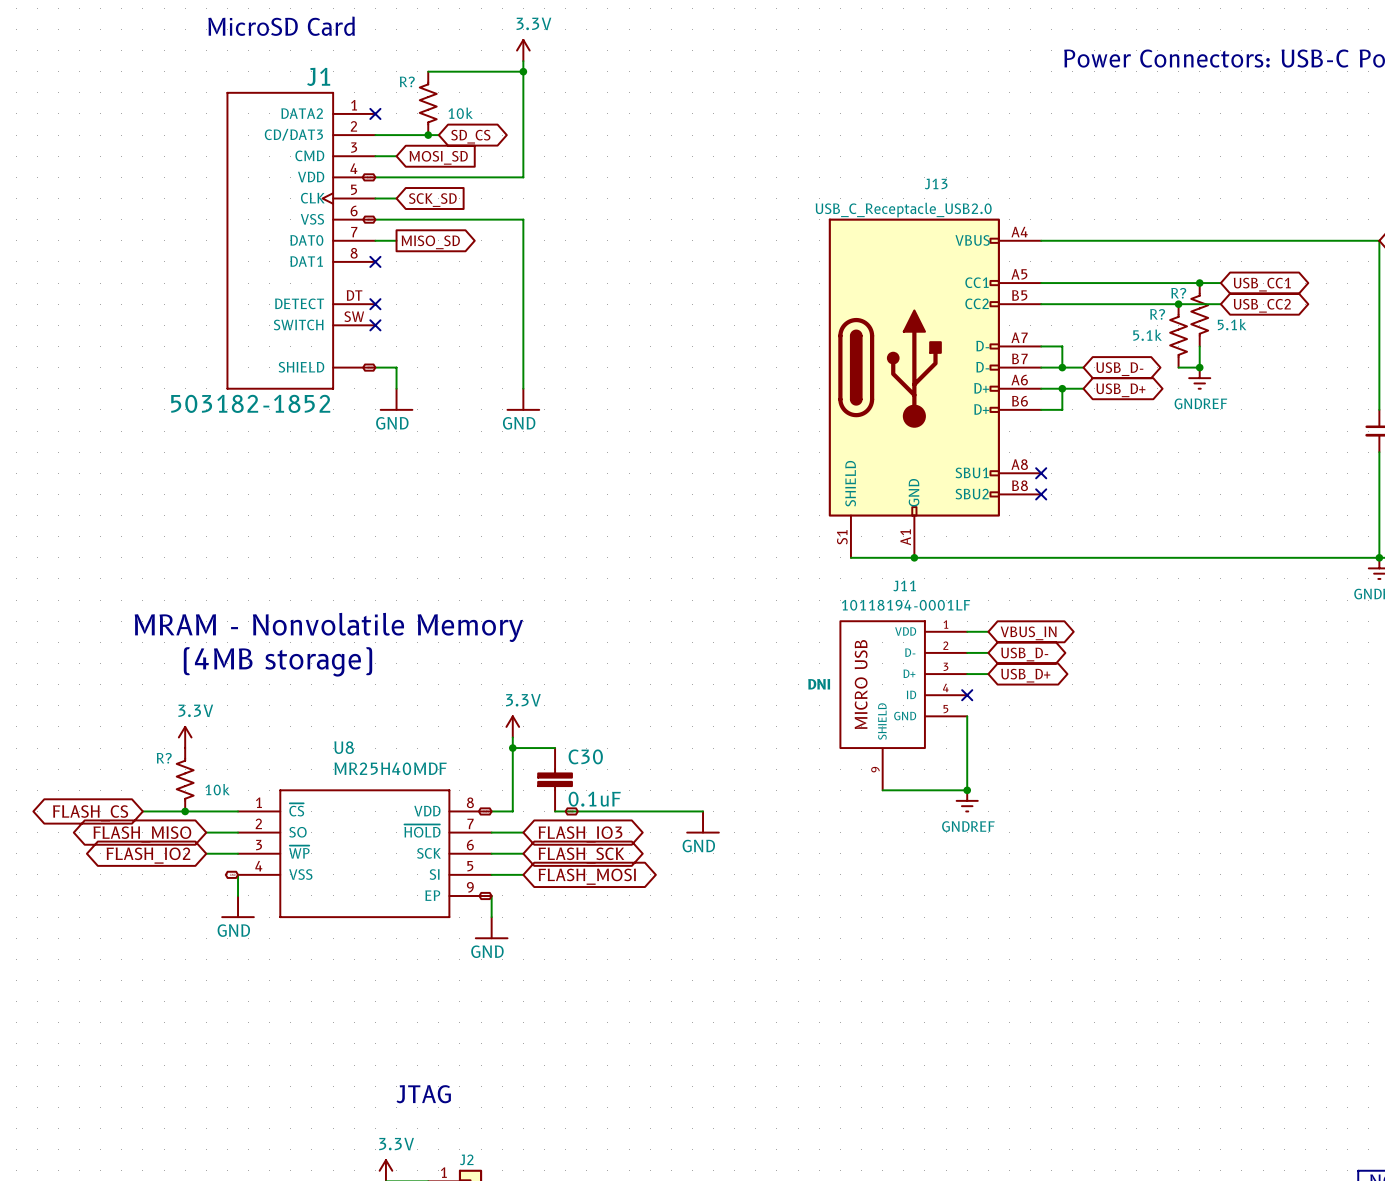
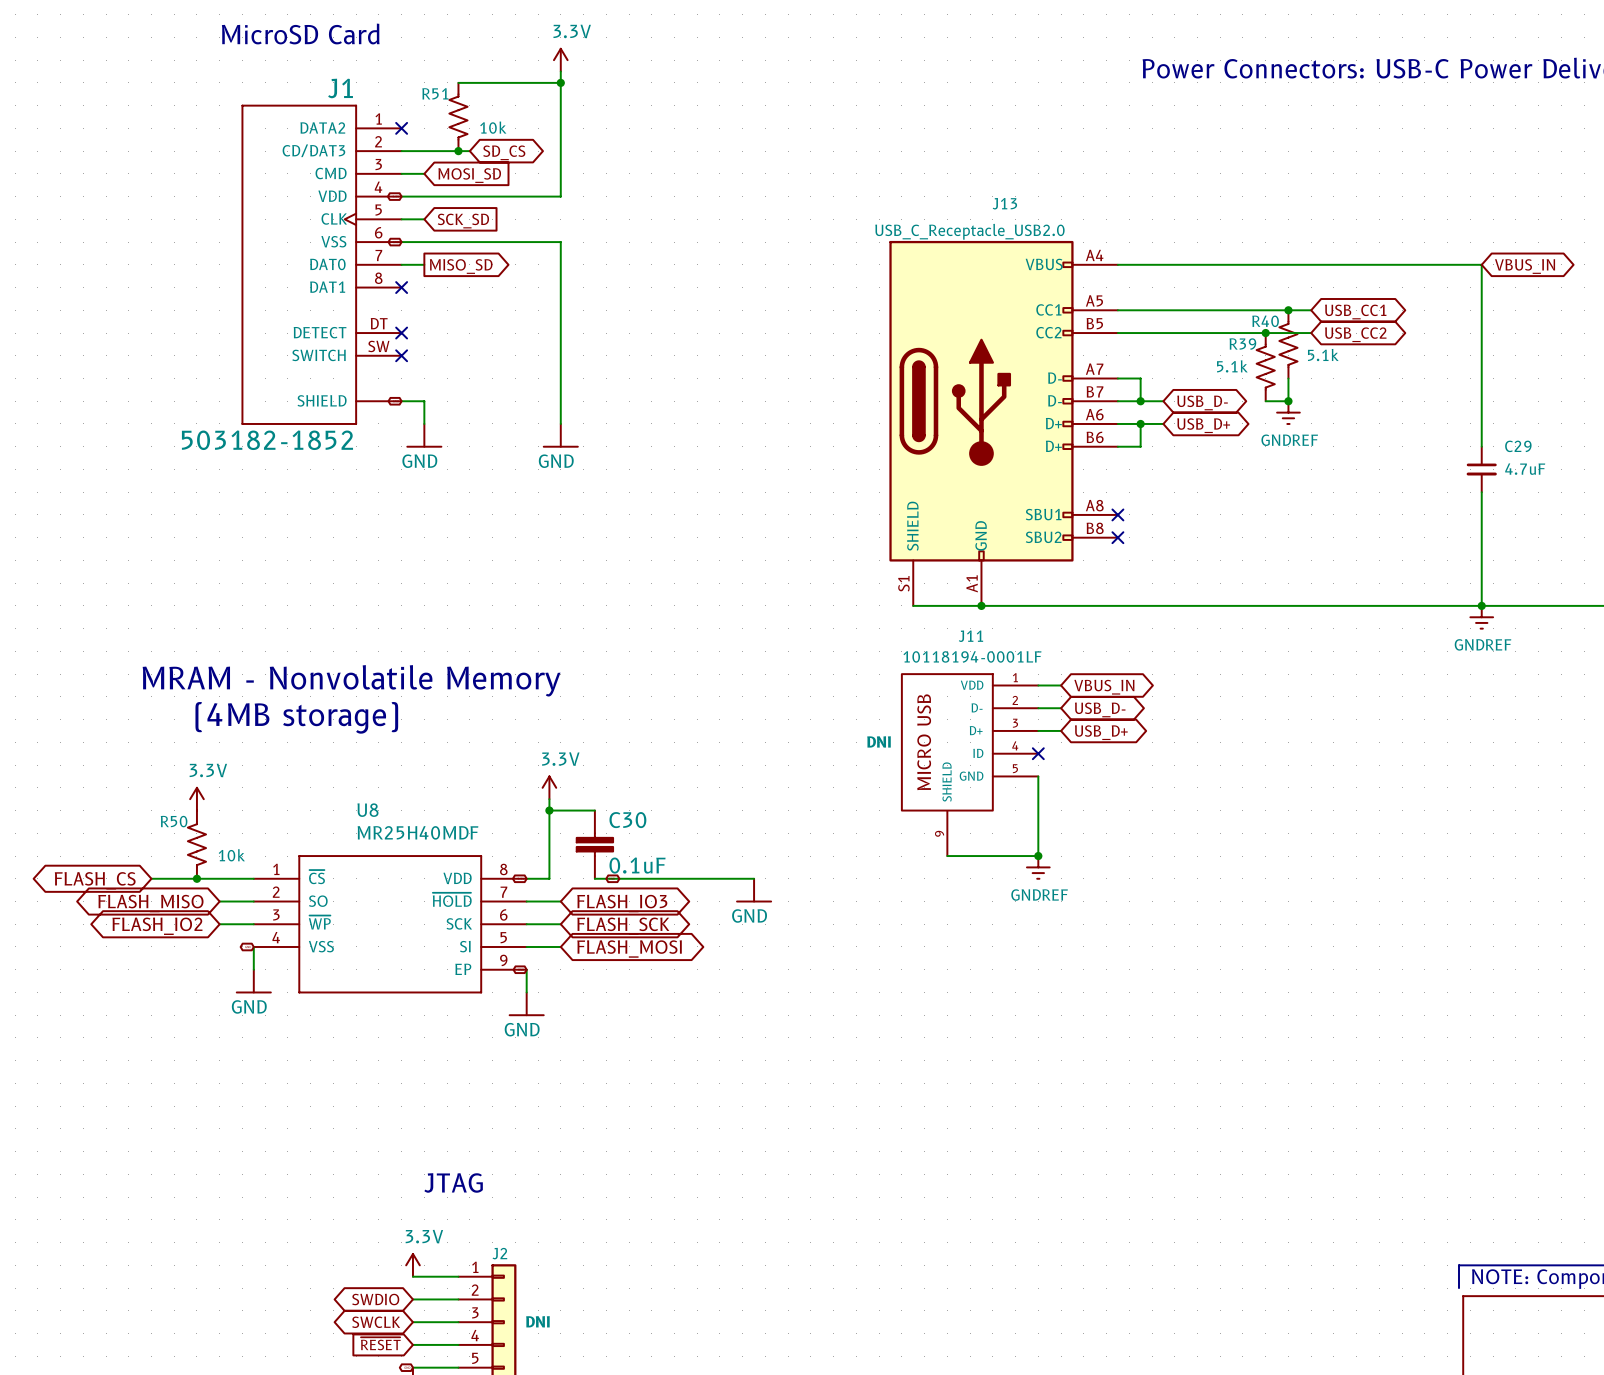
R? name: R? (407, 81) -> R51 (435, 93)
R? name: R? (1178, 293) -> R40 (1265, 321)
R? name: R? (1157, 314) -> R39 (1242, 344)
R? name: R? (164, 758) -> R50 (174, 821)

